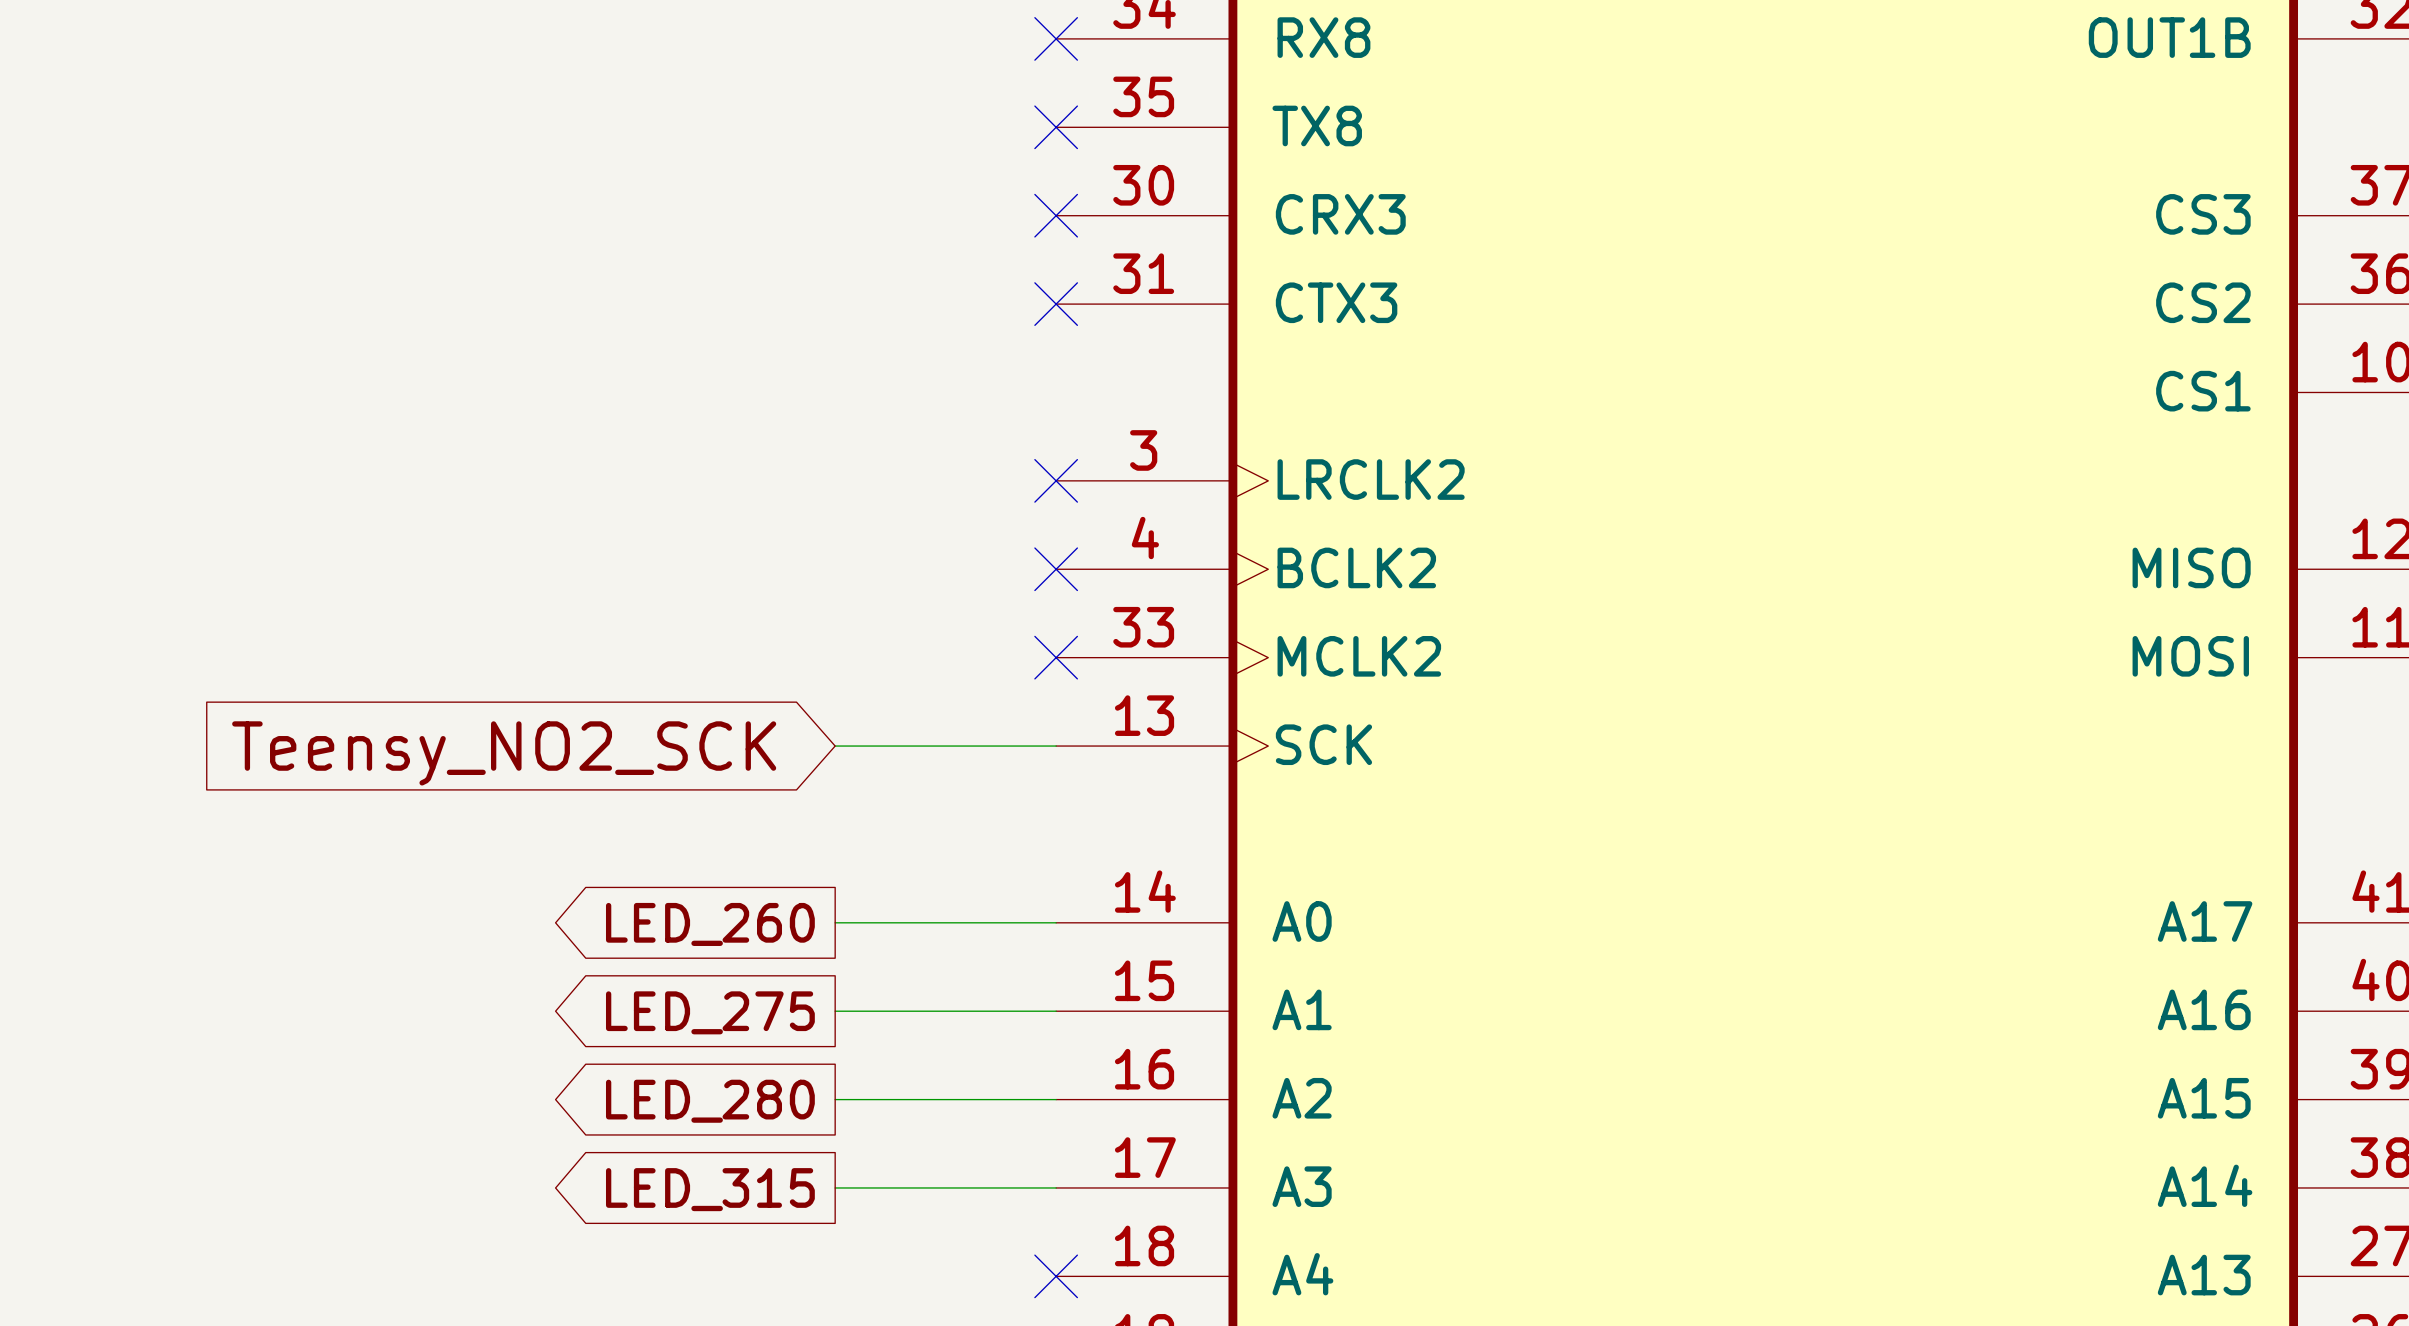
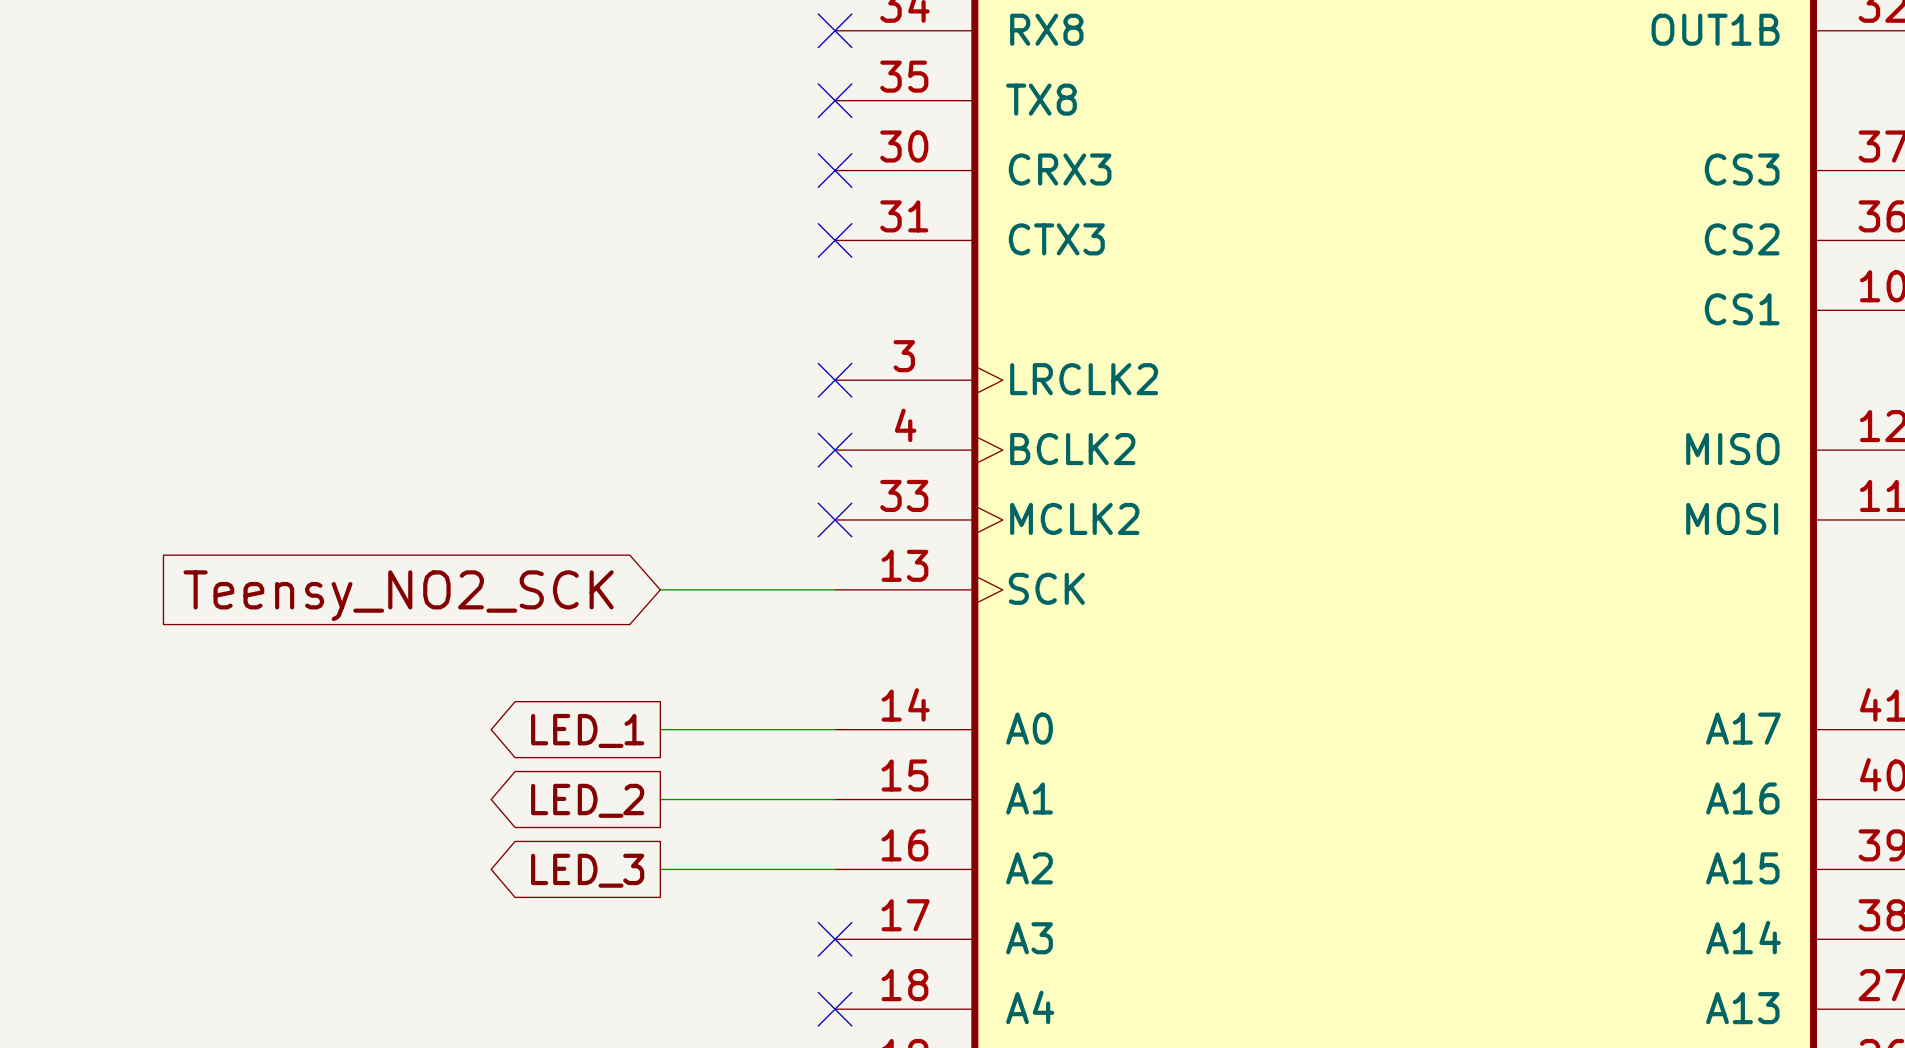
global label: LED_260 (710, 924) -> LED_1 (587, 730)
global label: LED_275 (710, 1012) -> LED_2 (587, 800)
global label: LED_280 (710, 1101) -> LED_3 (587, 870)
wire: (835, 1187) (1056, 1187) -> none
no-connect mark: none -> (835, 939)
global label: LED_315 (710, 1189) -> none

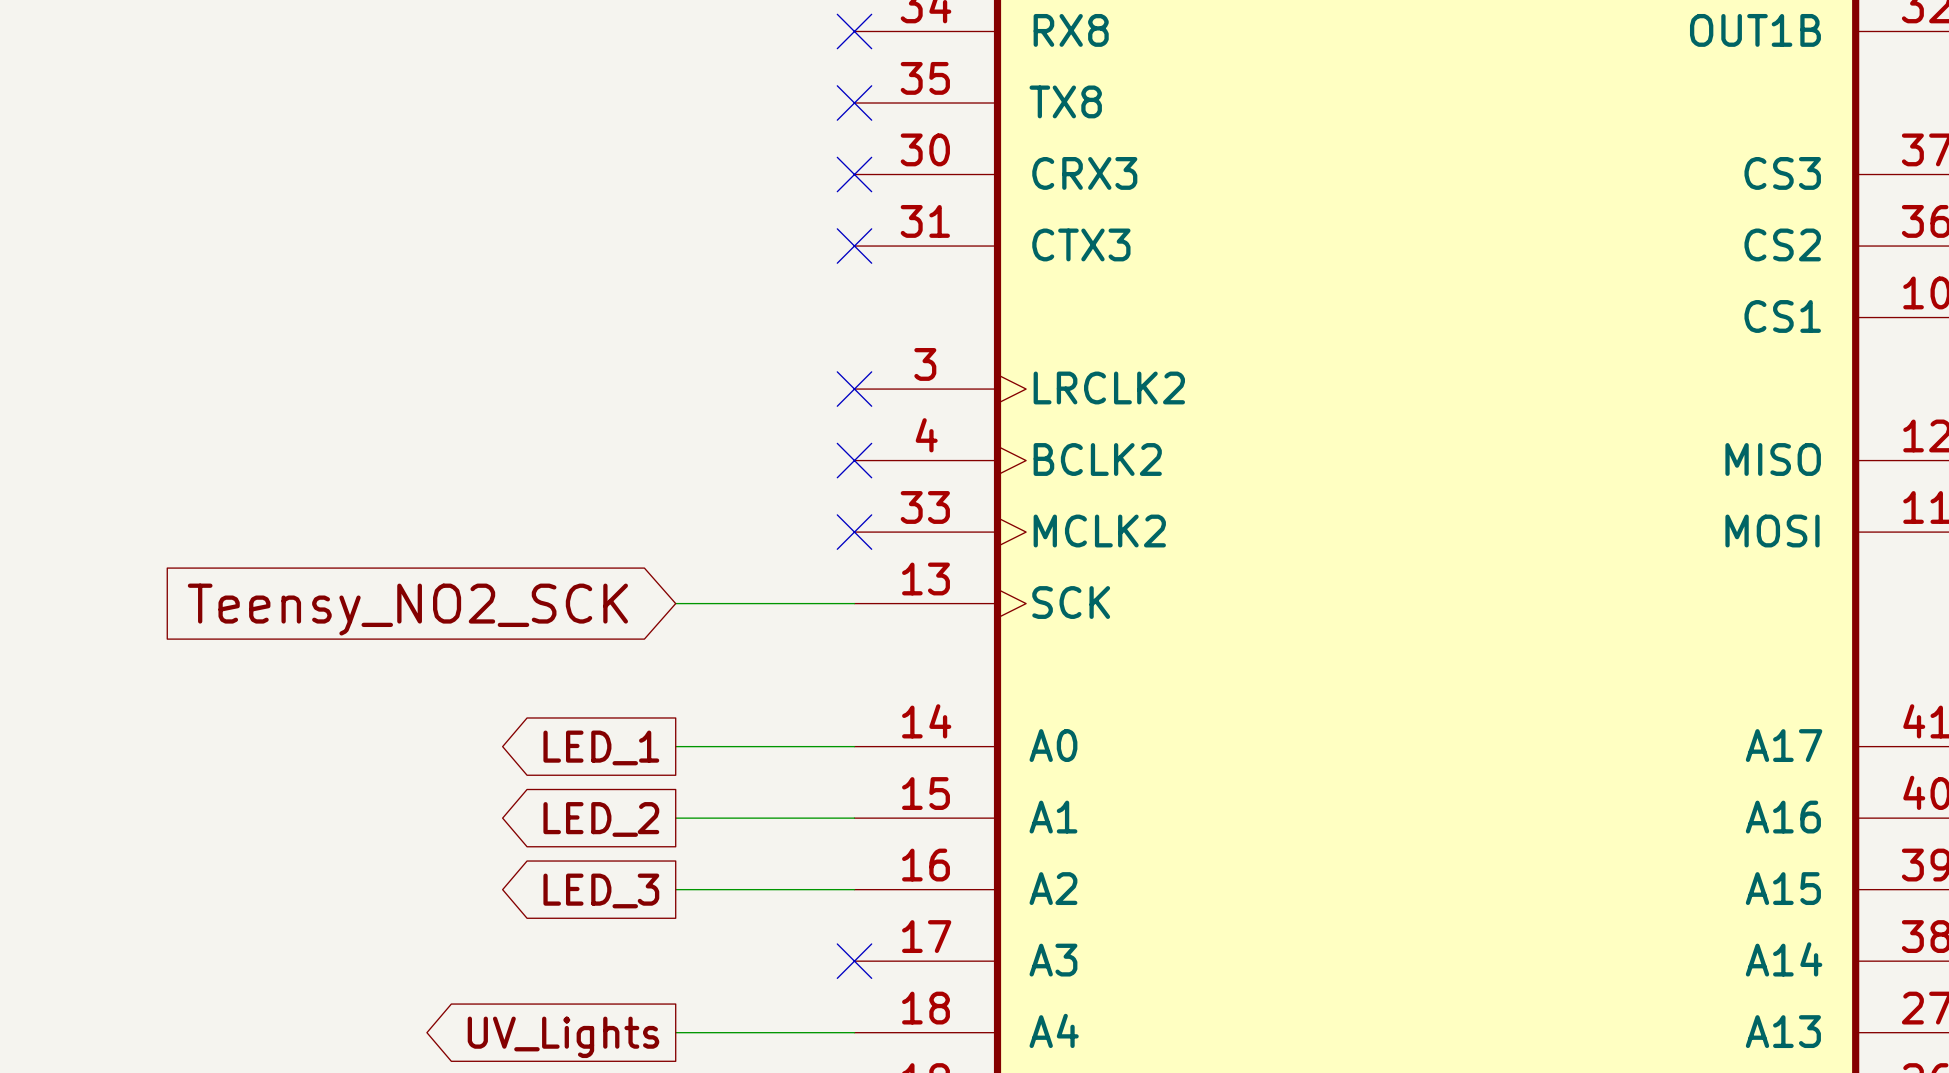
wire: none -> (675, 1032) (854, 1032)
no-connect mark: (835, 1009) -> none
global label: none -> UV_Lights (563, 1037)

